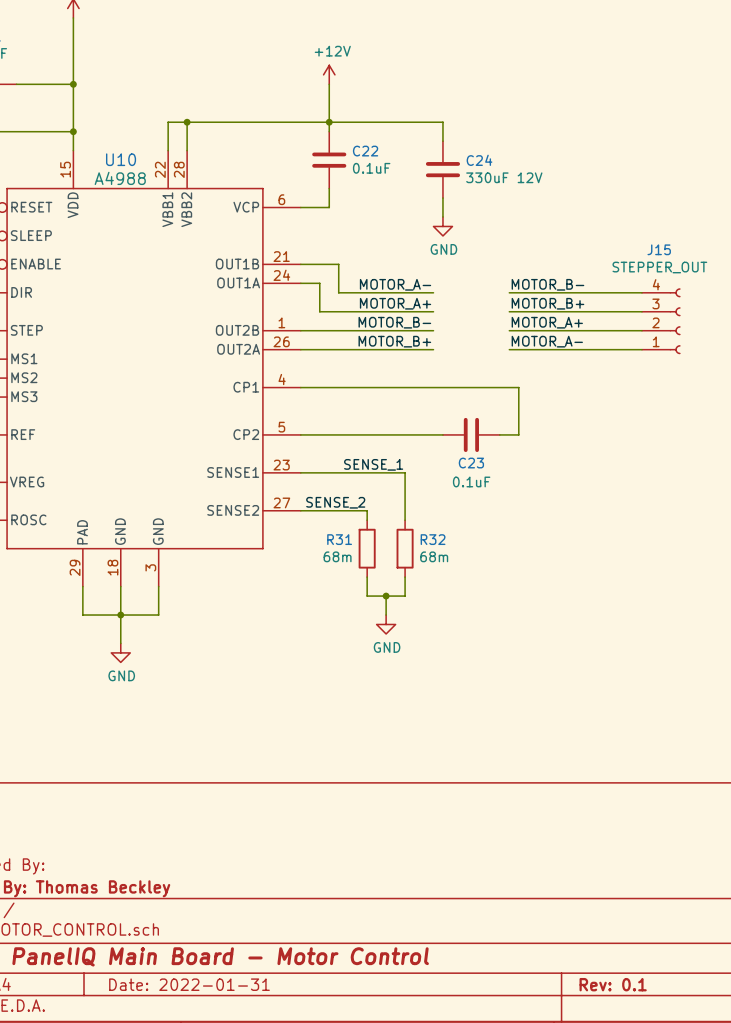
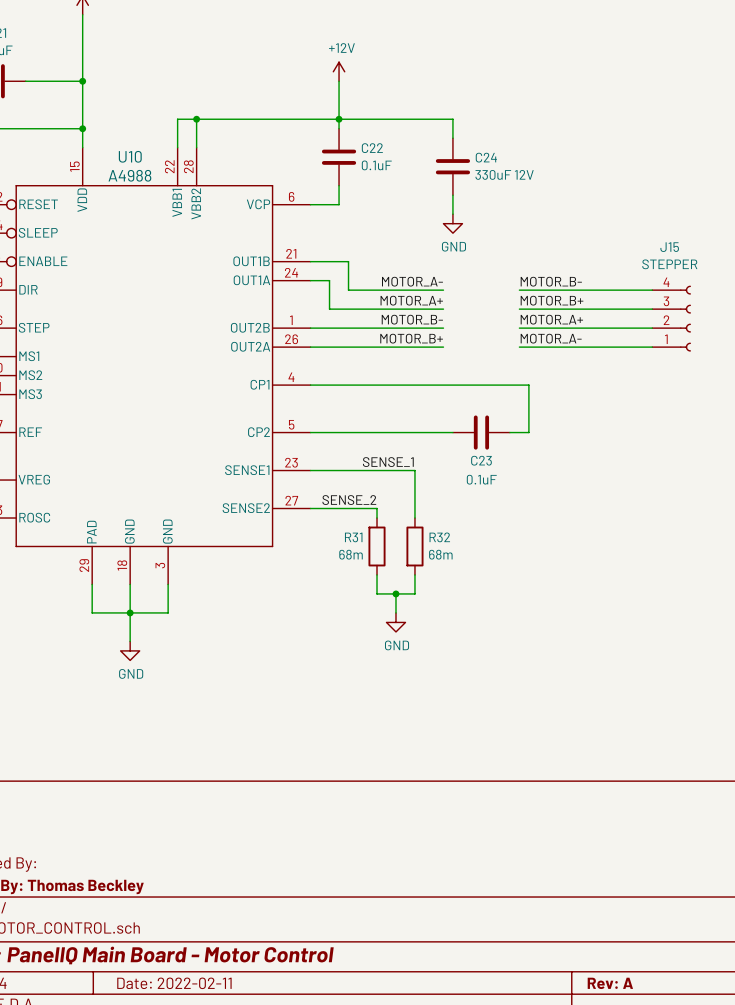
J15 value: STEPPER_OUT (659, 267) -> STEPPER (669, 264)
title block: Date: 2022-01-31 (189, 984) -> Date: 2022-02-11 (174, 983)
title block: Rev: 0.1 (613, 984) -> Rev: A (610, 983)

